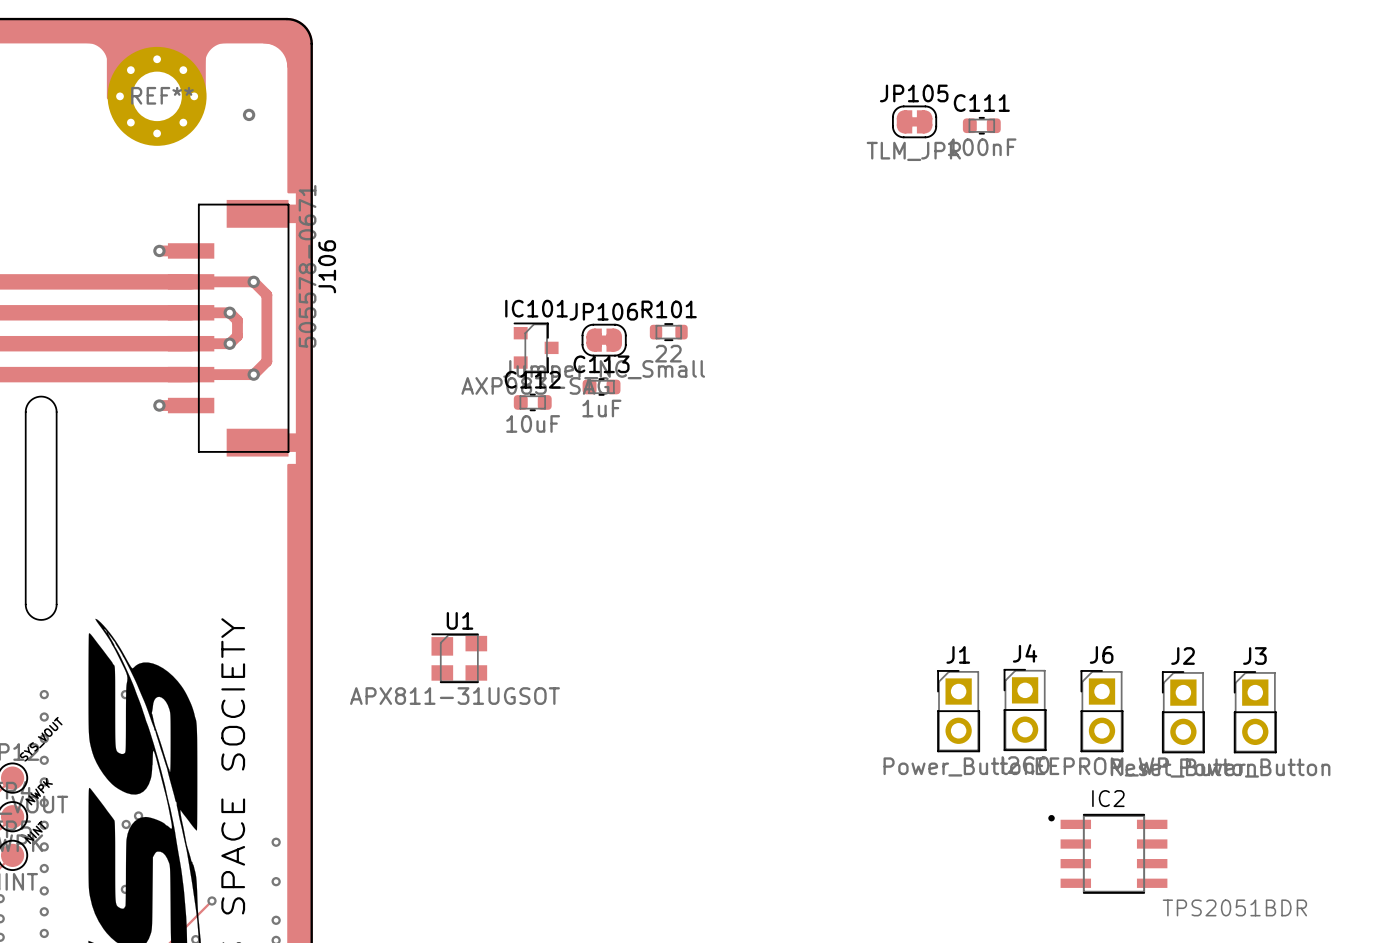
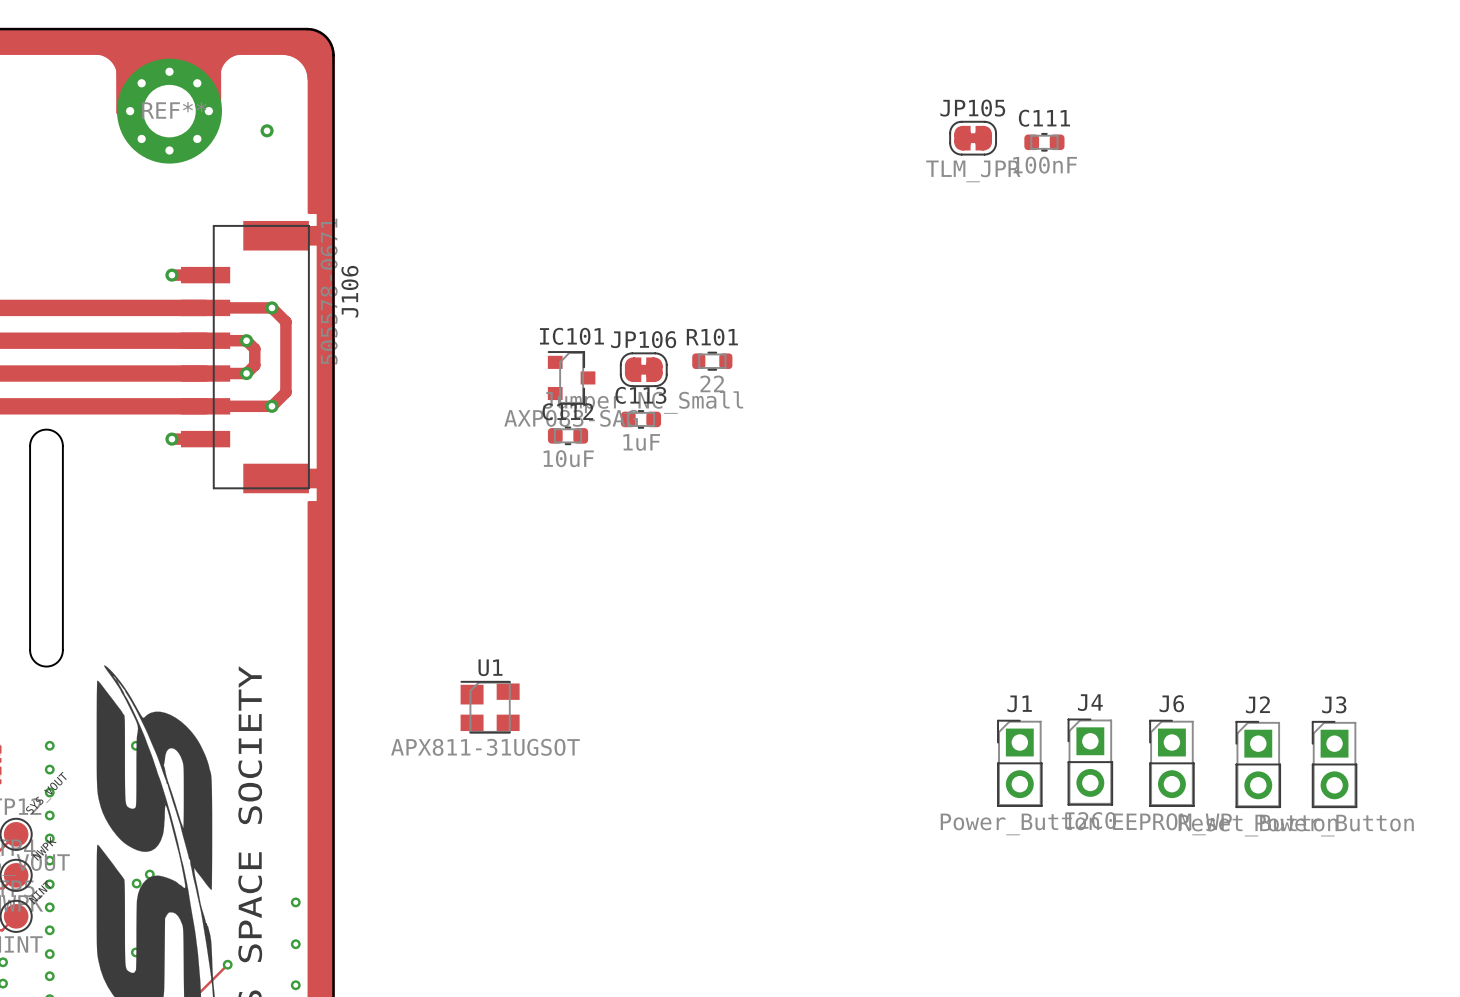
IC2: TPS2051BDR (1107, 853) -> none

